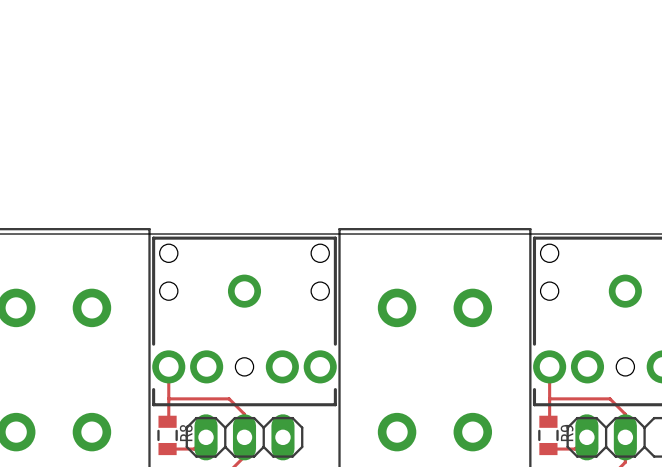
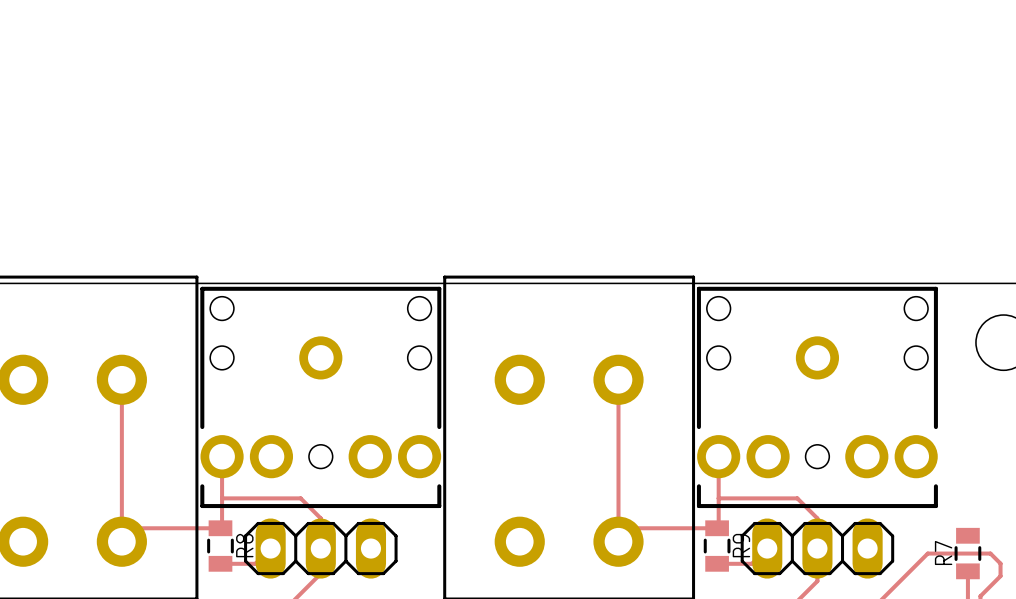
track: none -> (121, 379) (121, 541) (135, 528) (220, 528)
track: none -> (618, 379) (618, 541)
track: none -> (717, 528) (628, 528) (618, 538)

